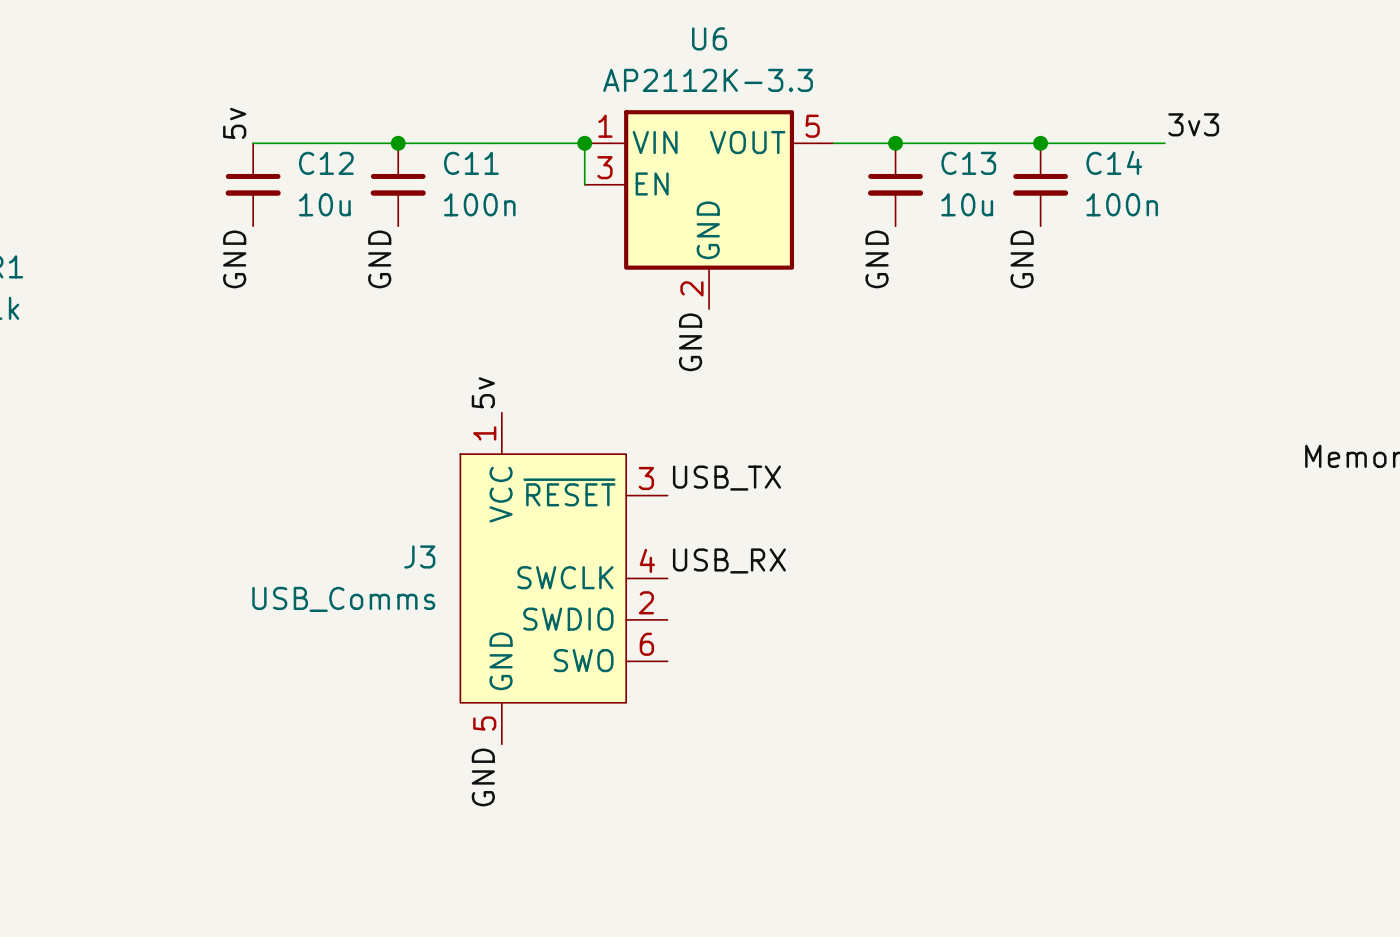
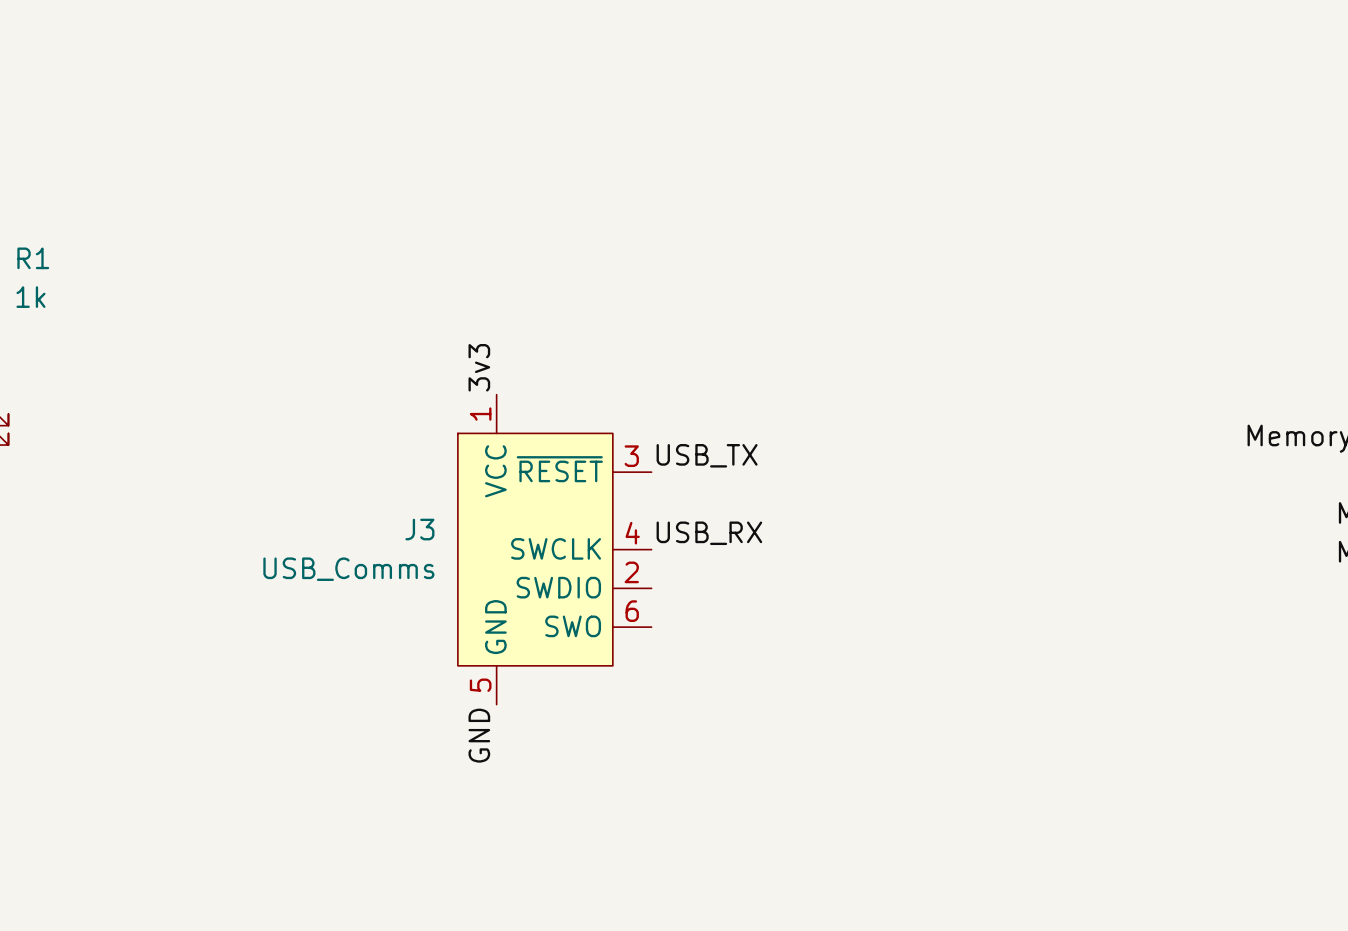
label: 5v (234, 123) -> none
label: 3v3 (1193, 124) -> none
wire: (253, 143) (584, 143) (584, 184) -> none
junction: (398, 143) -> none
junction: (584, 143) -> none
wire: (833, 143) (1164, 143) -> none
junction: (895, 143) -> none
junction: (1040, 143) -> none
C12: 10u (253, 184) -> none
C11: 100n (398, 184) -> none
C13: 10u (895, 184) -> none
C14: 100n (1040, 184) -> none
U6: AP2112K-3.3 (709, 209) -> none
label: GND (234, 259) -> none
label: GND (379, 259) -> none
label: GND (877, 259) -> none
label: GND (1022, 259) -> none
label: GND (690, 342) -> none
label: 5v (483, 392) -> 3v3 (479, 367)

